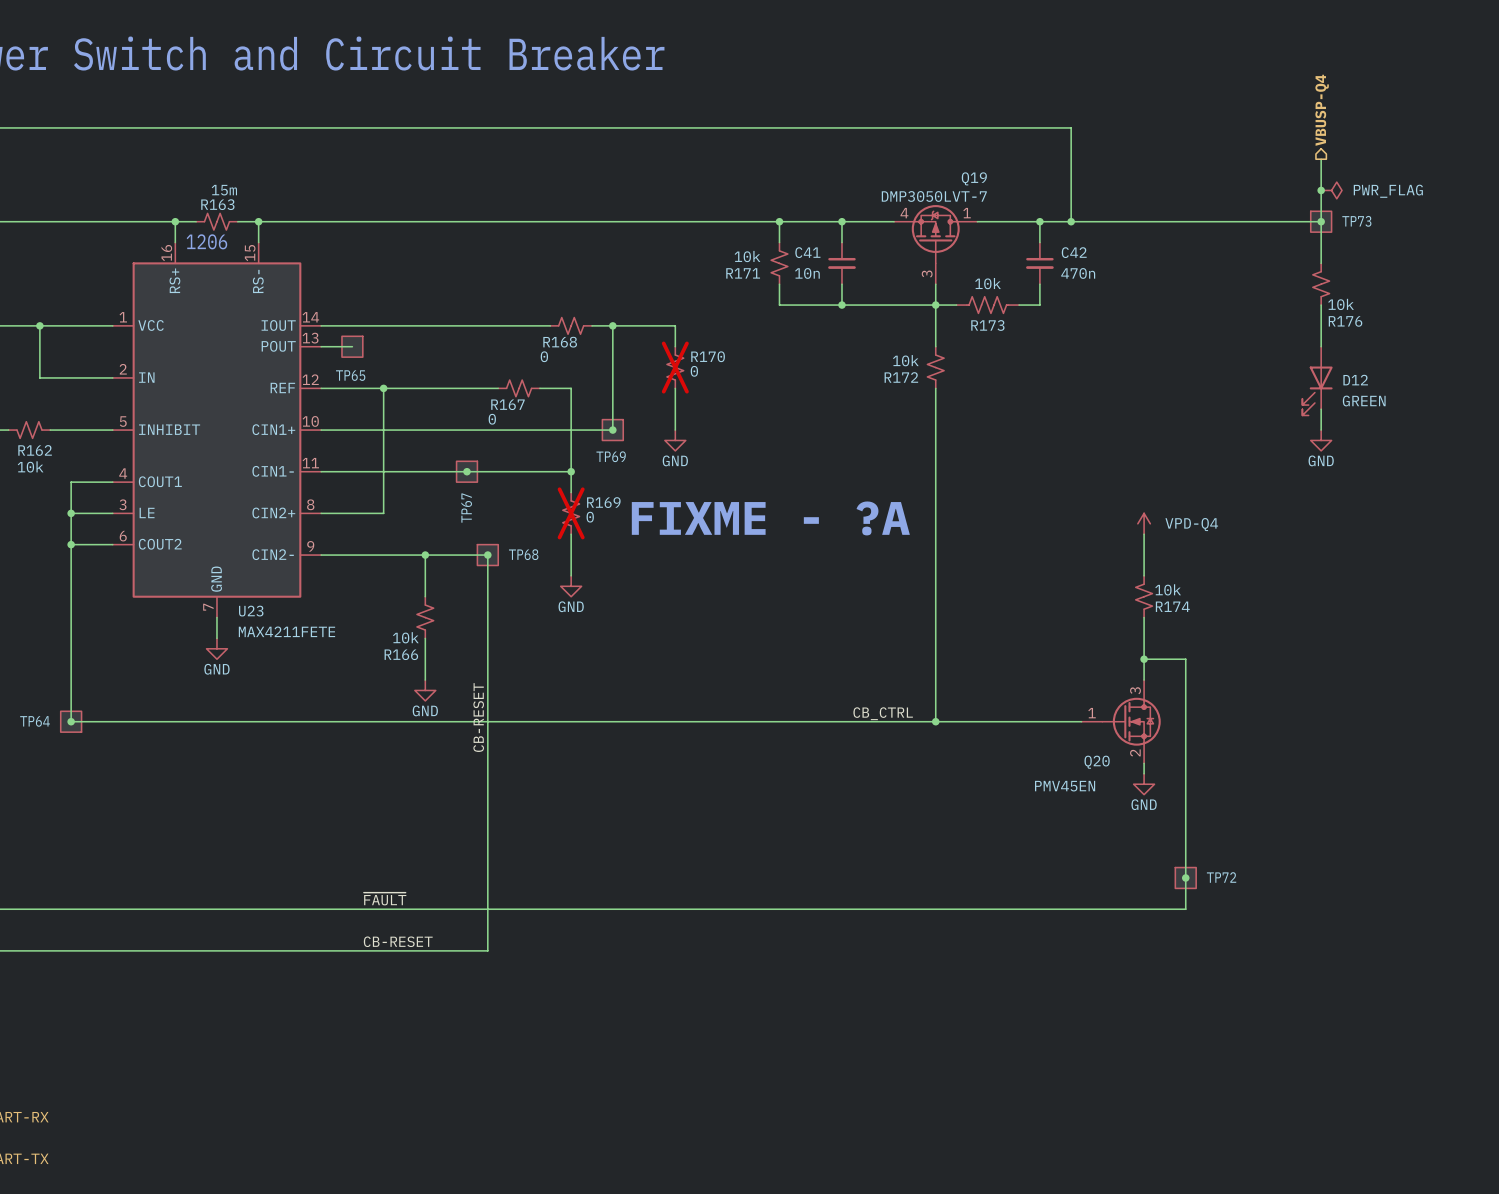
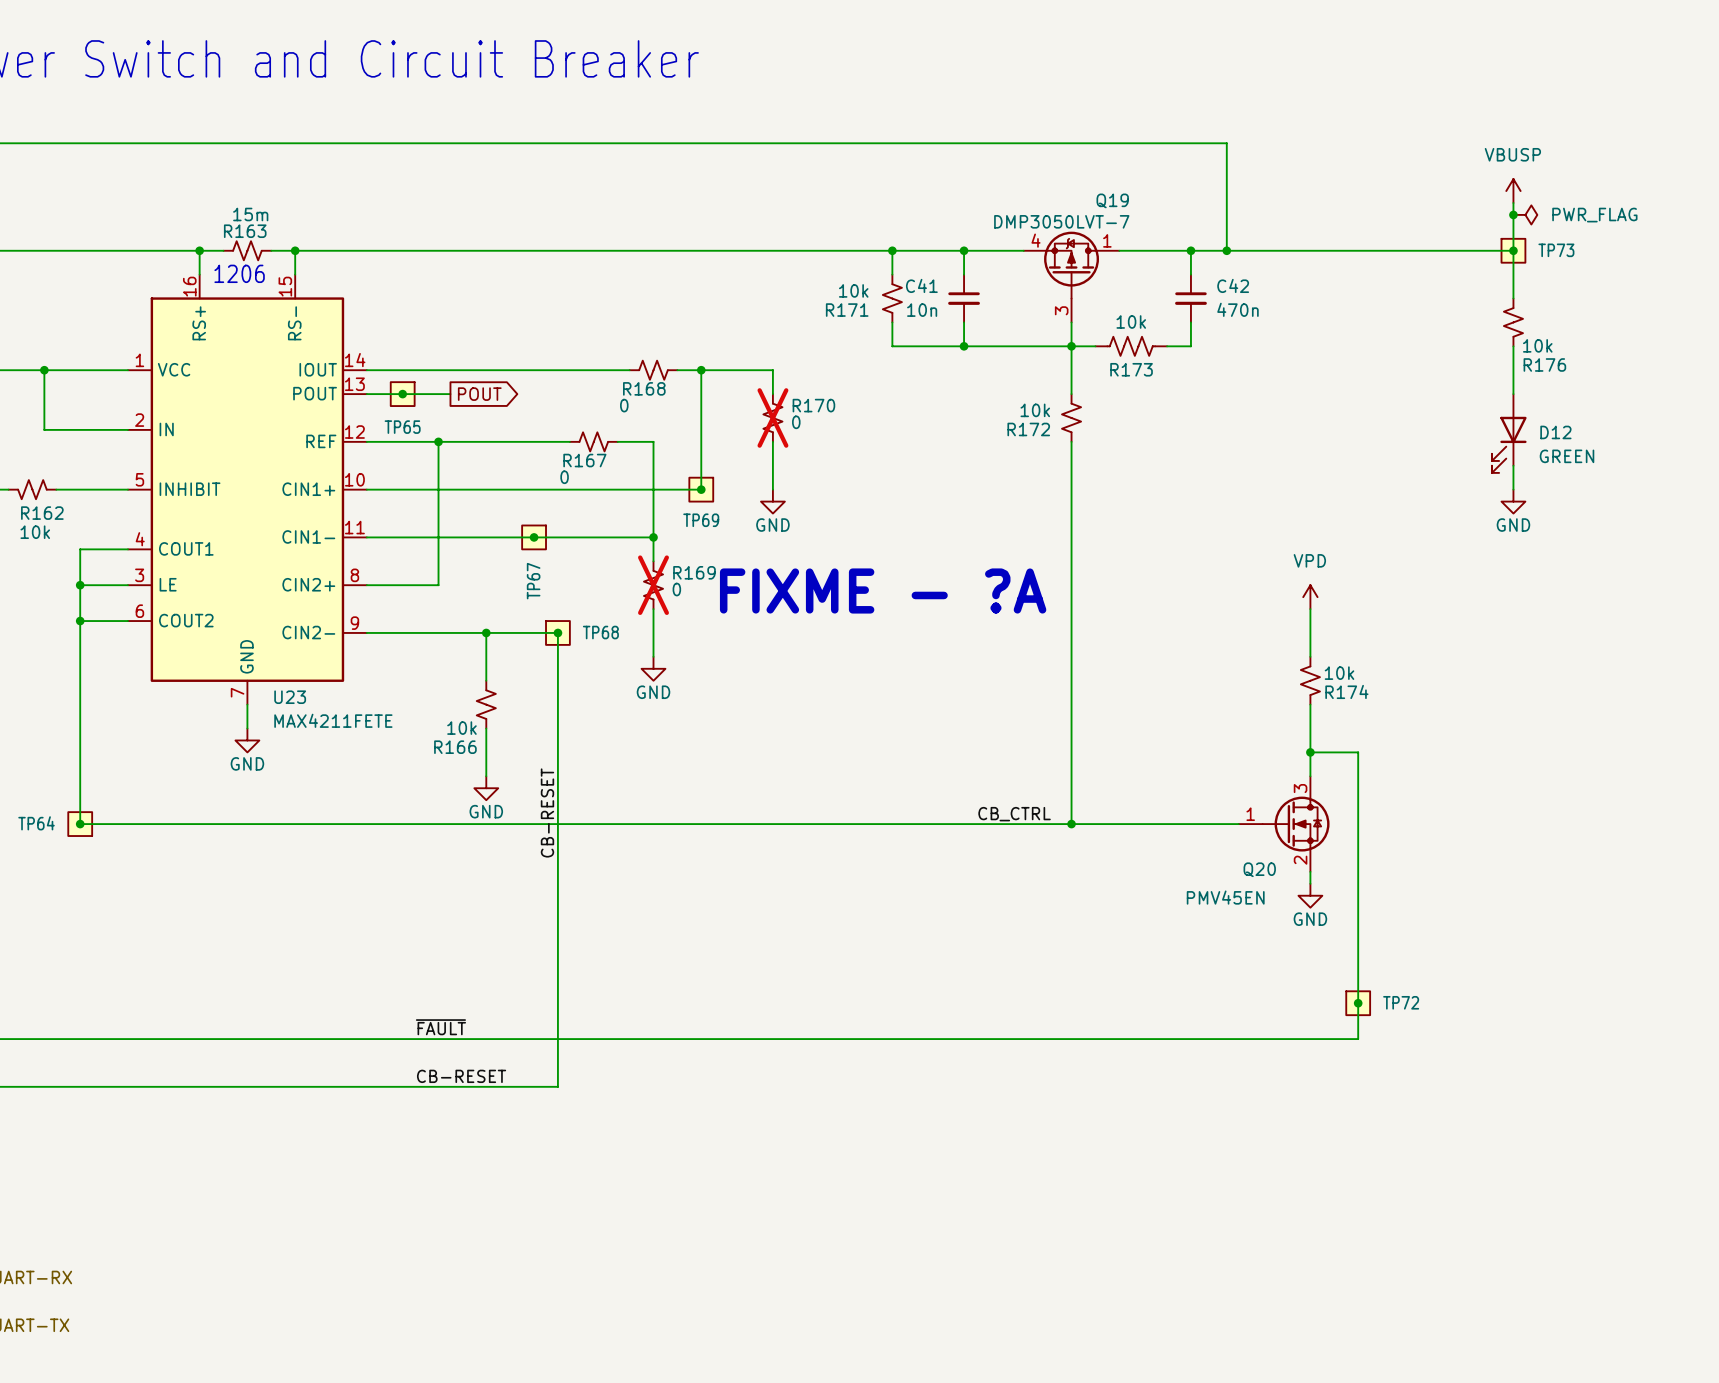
hierarchical label: VBUSP-Q4 (1322, 110) -> none
power symbol: none -> VBUSP (1513, 191)
wire: none -> (402, 394) (450, 394)
junction: none -> (402, 394)
global label: none -> POUT (479, 394)
power symbol: VPD-Q4 (1144, 523) -> VPD (1310, 597)

